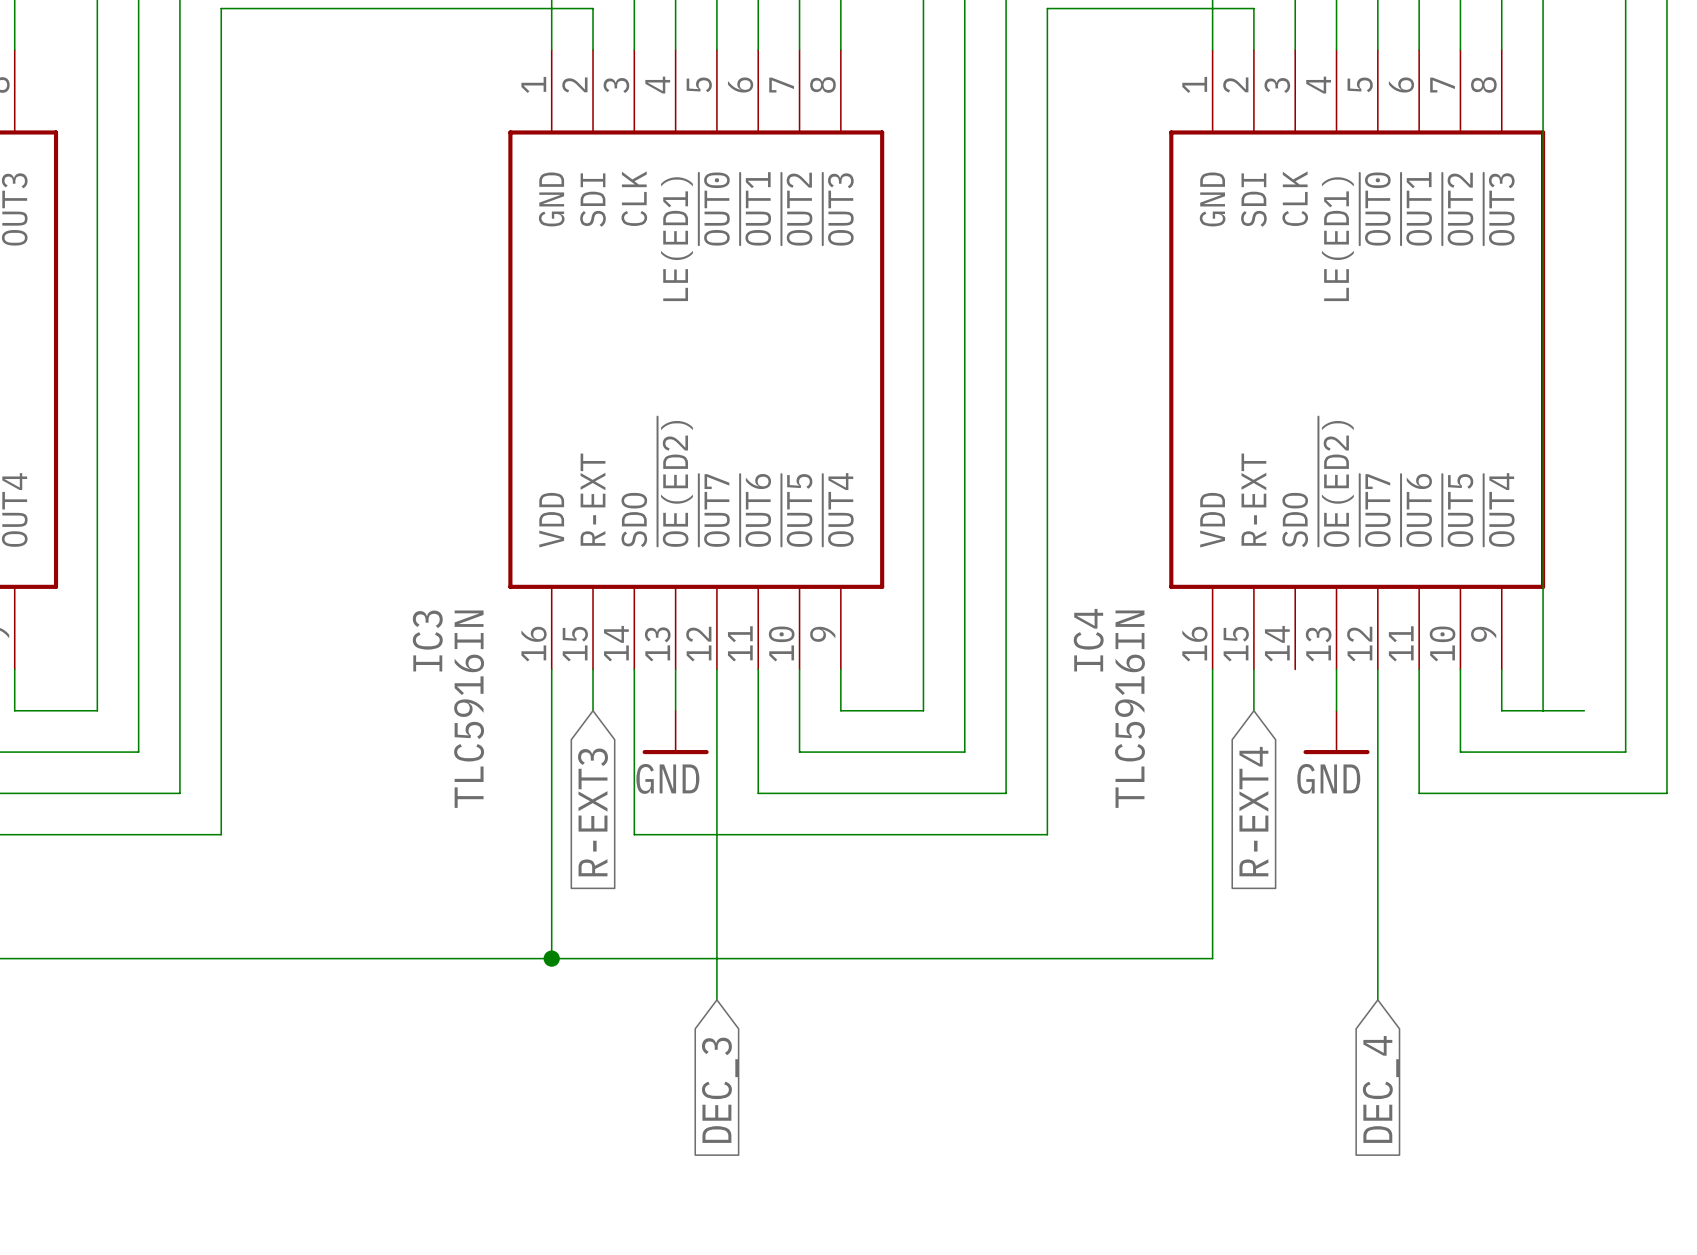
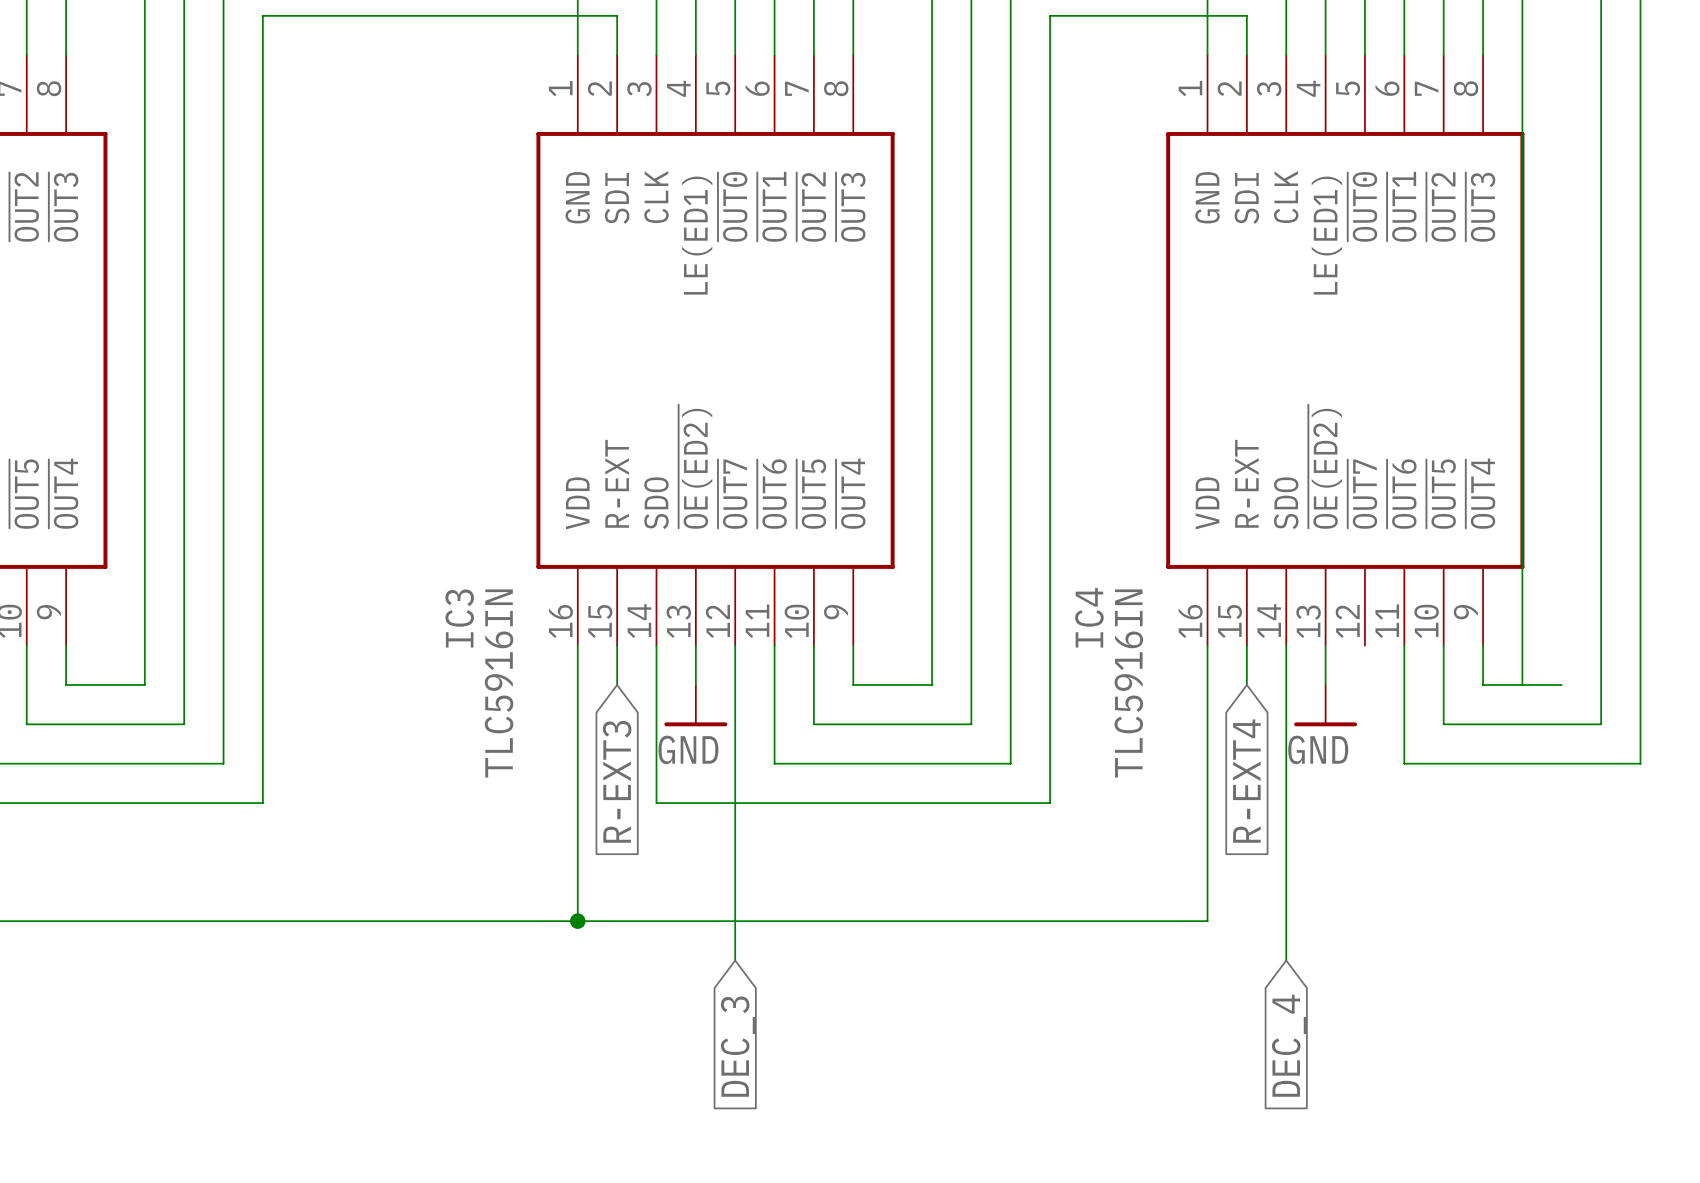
wire: (1377, 669) (1377, 999) -> (1286, 645) (1286, 960)
global label position: DEC_4 (1381, 1089) -> DEC_4 (1289, 1045)

